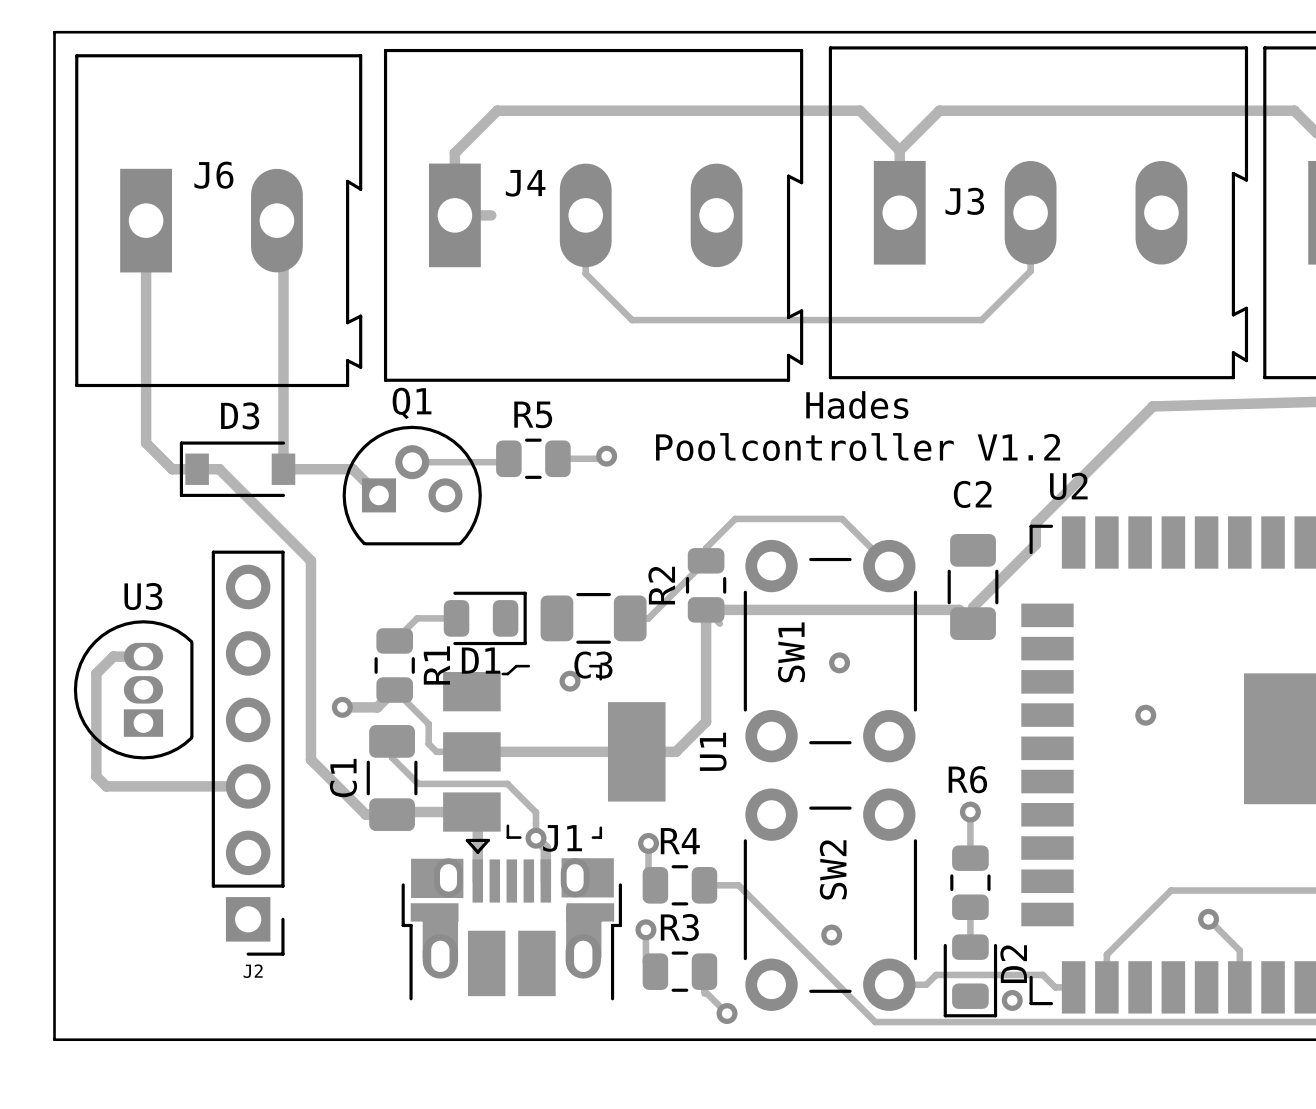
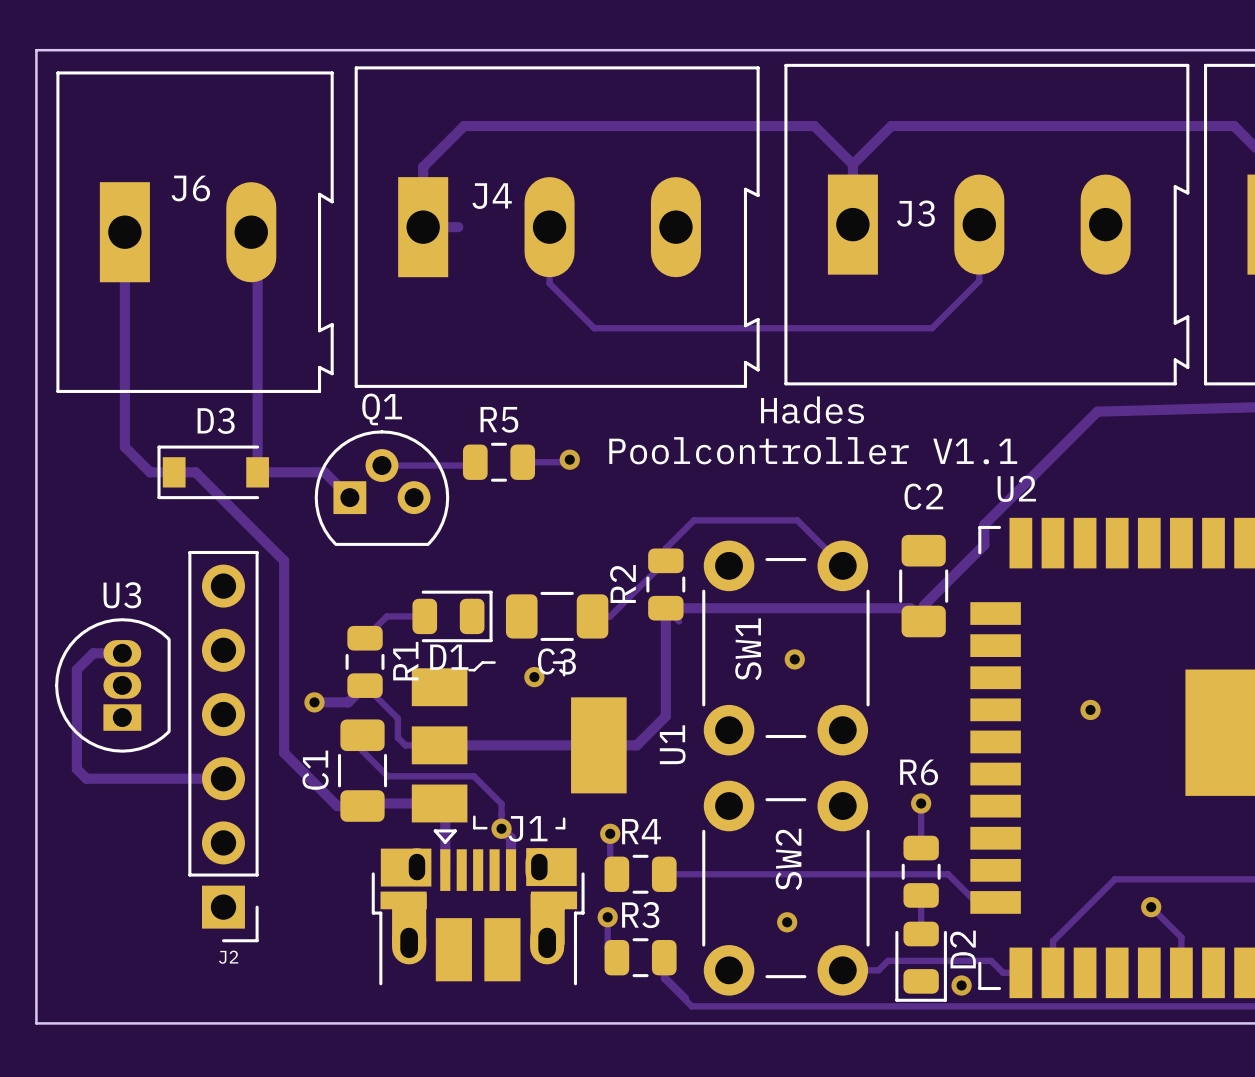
text: Poolcontroller V1.2 (858, 447) -> Poolcontroller V1.1 (813, 450)
track: (738, 885) (875, 1022) -> (664, 978) (691, 1006) (829, 1006)
track: none -> (697, 874) (948, 874) (976, 902) (995, 902)
via: (727, 1013) -> none

